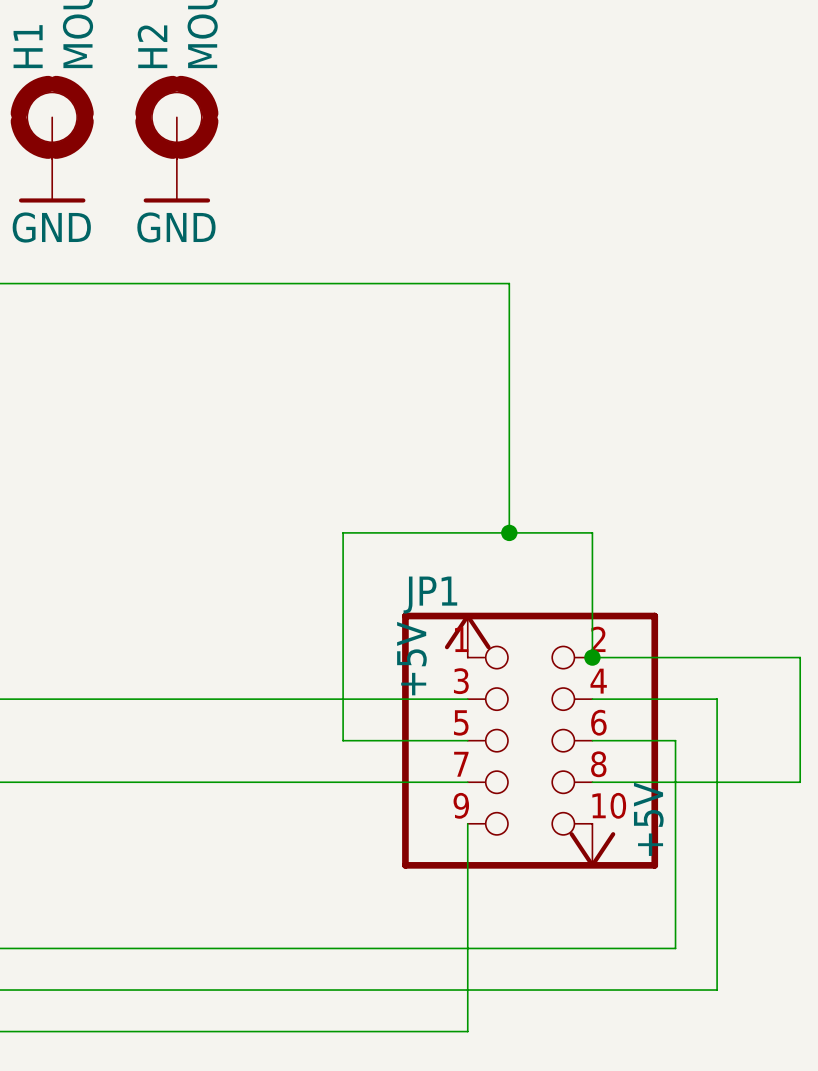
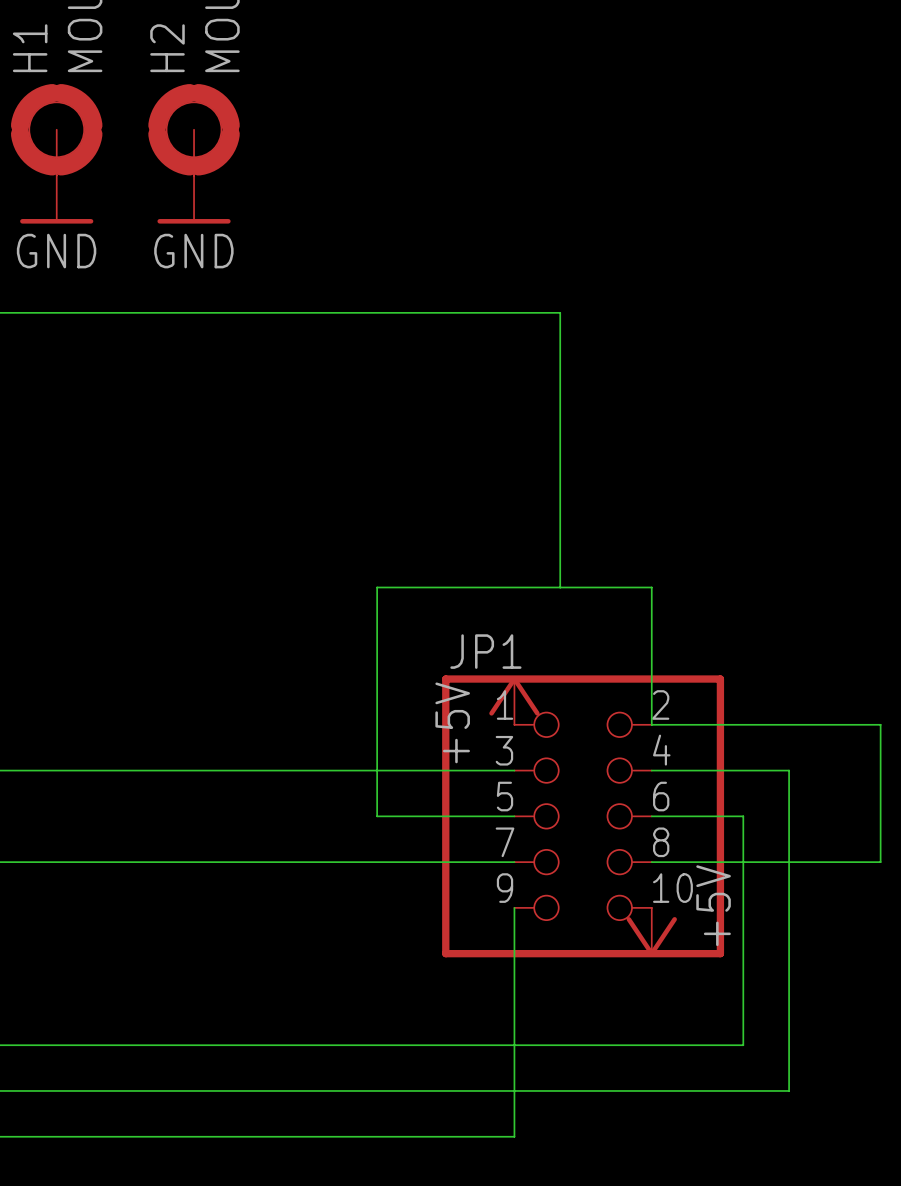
junction: (509, 532) -> none
junction: (592, 657) -> none

